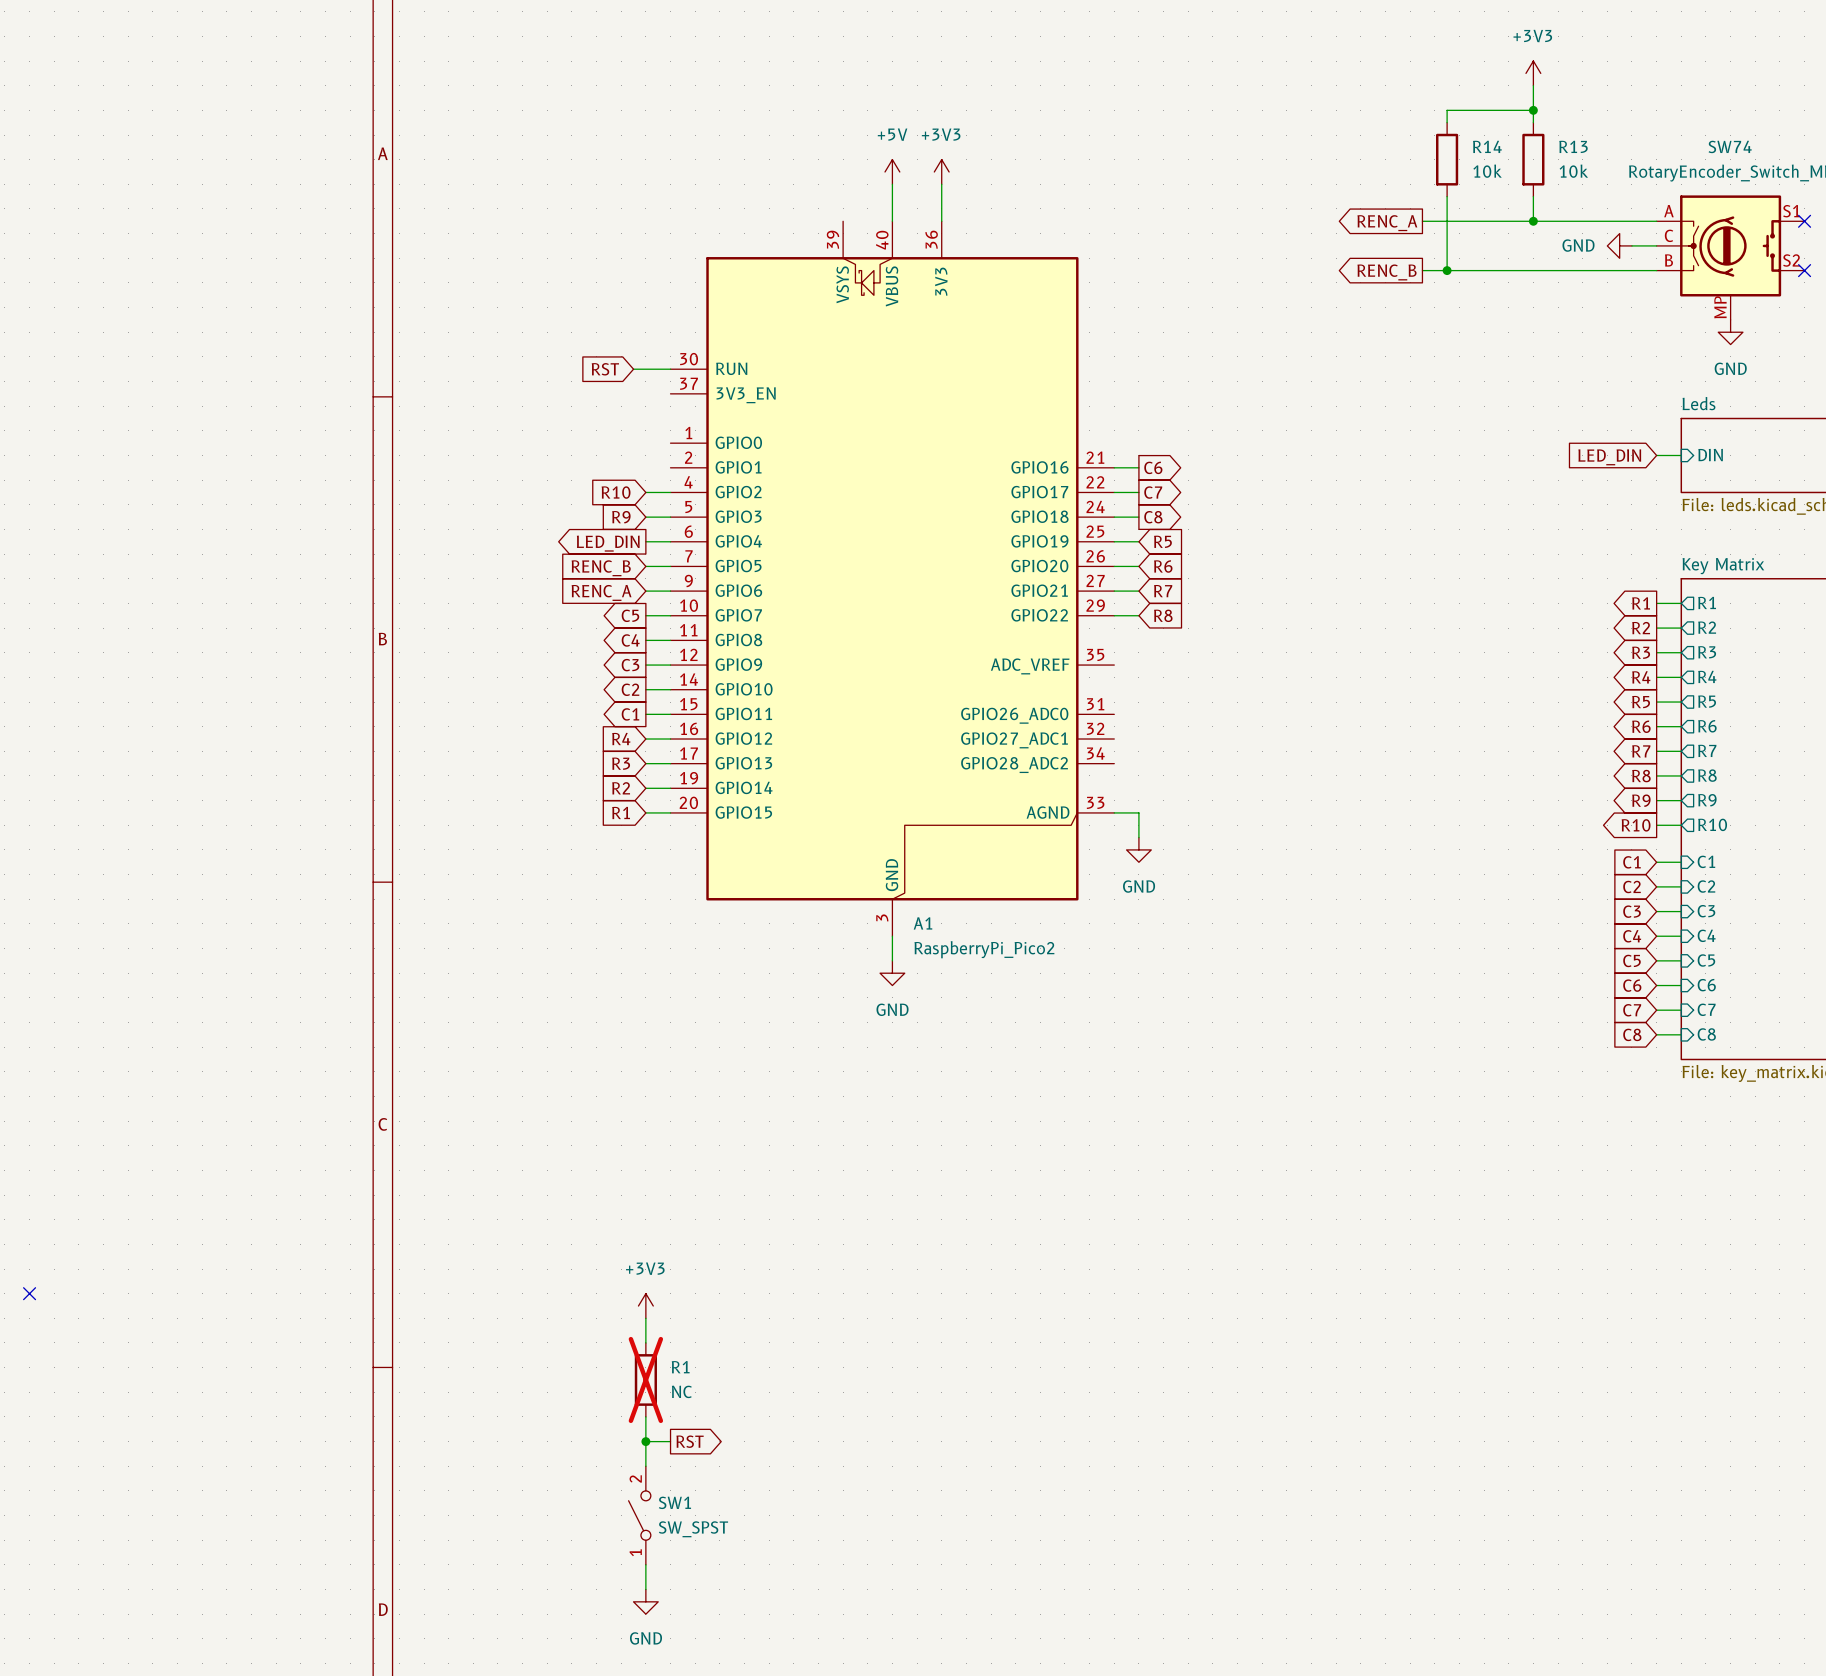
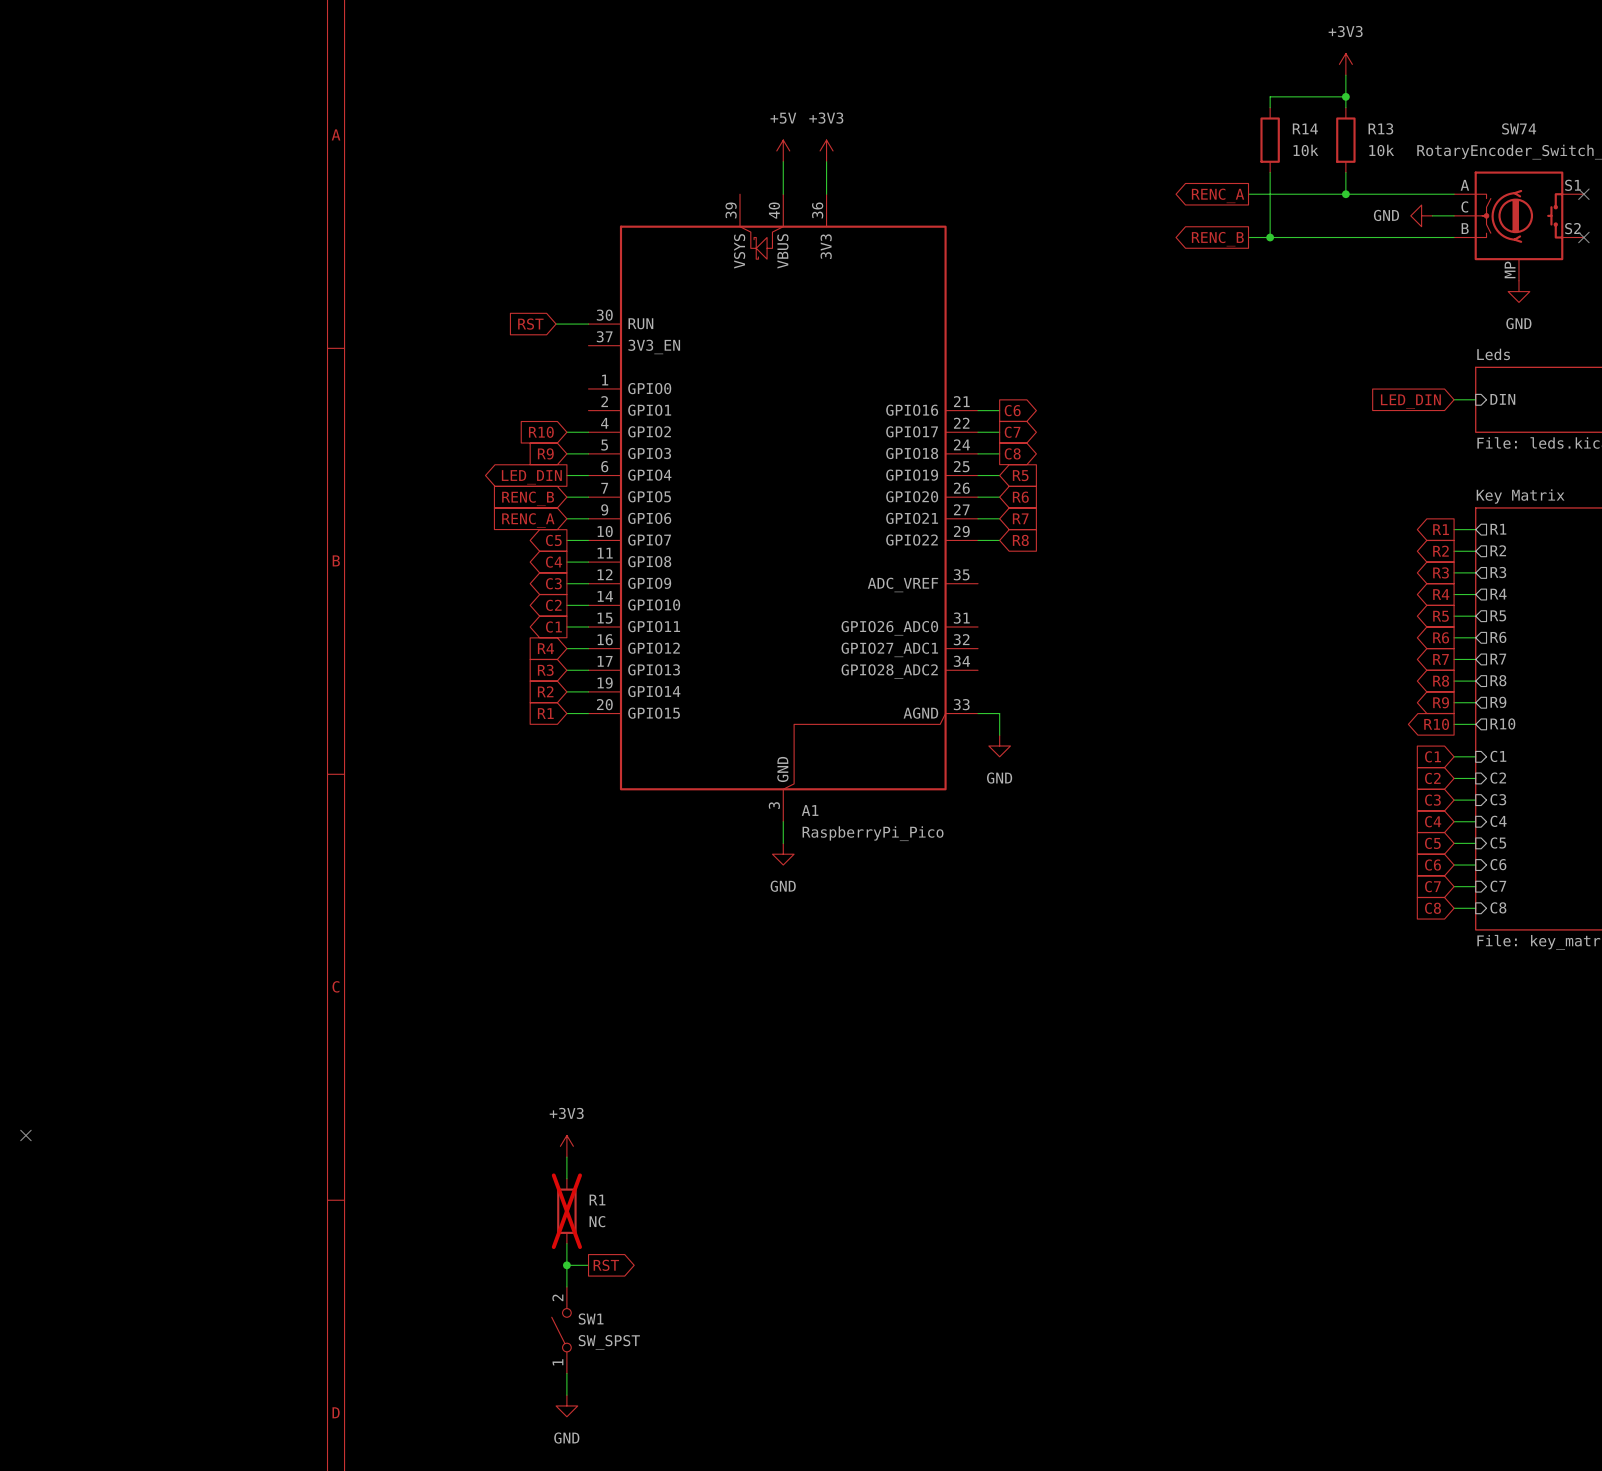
A1 value: RaspberryPi_Pico2 (984, 949) -> RaspberryPi_Pico (873, 833)

